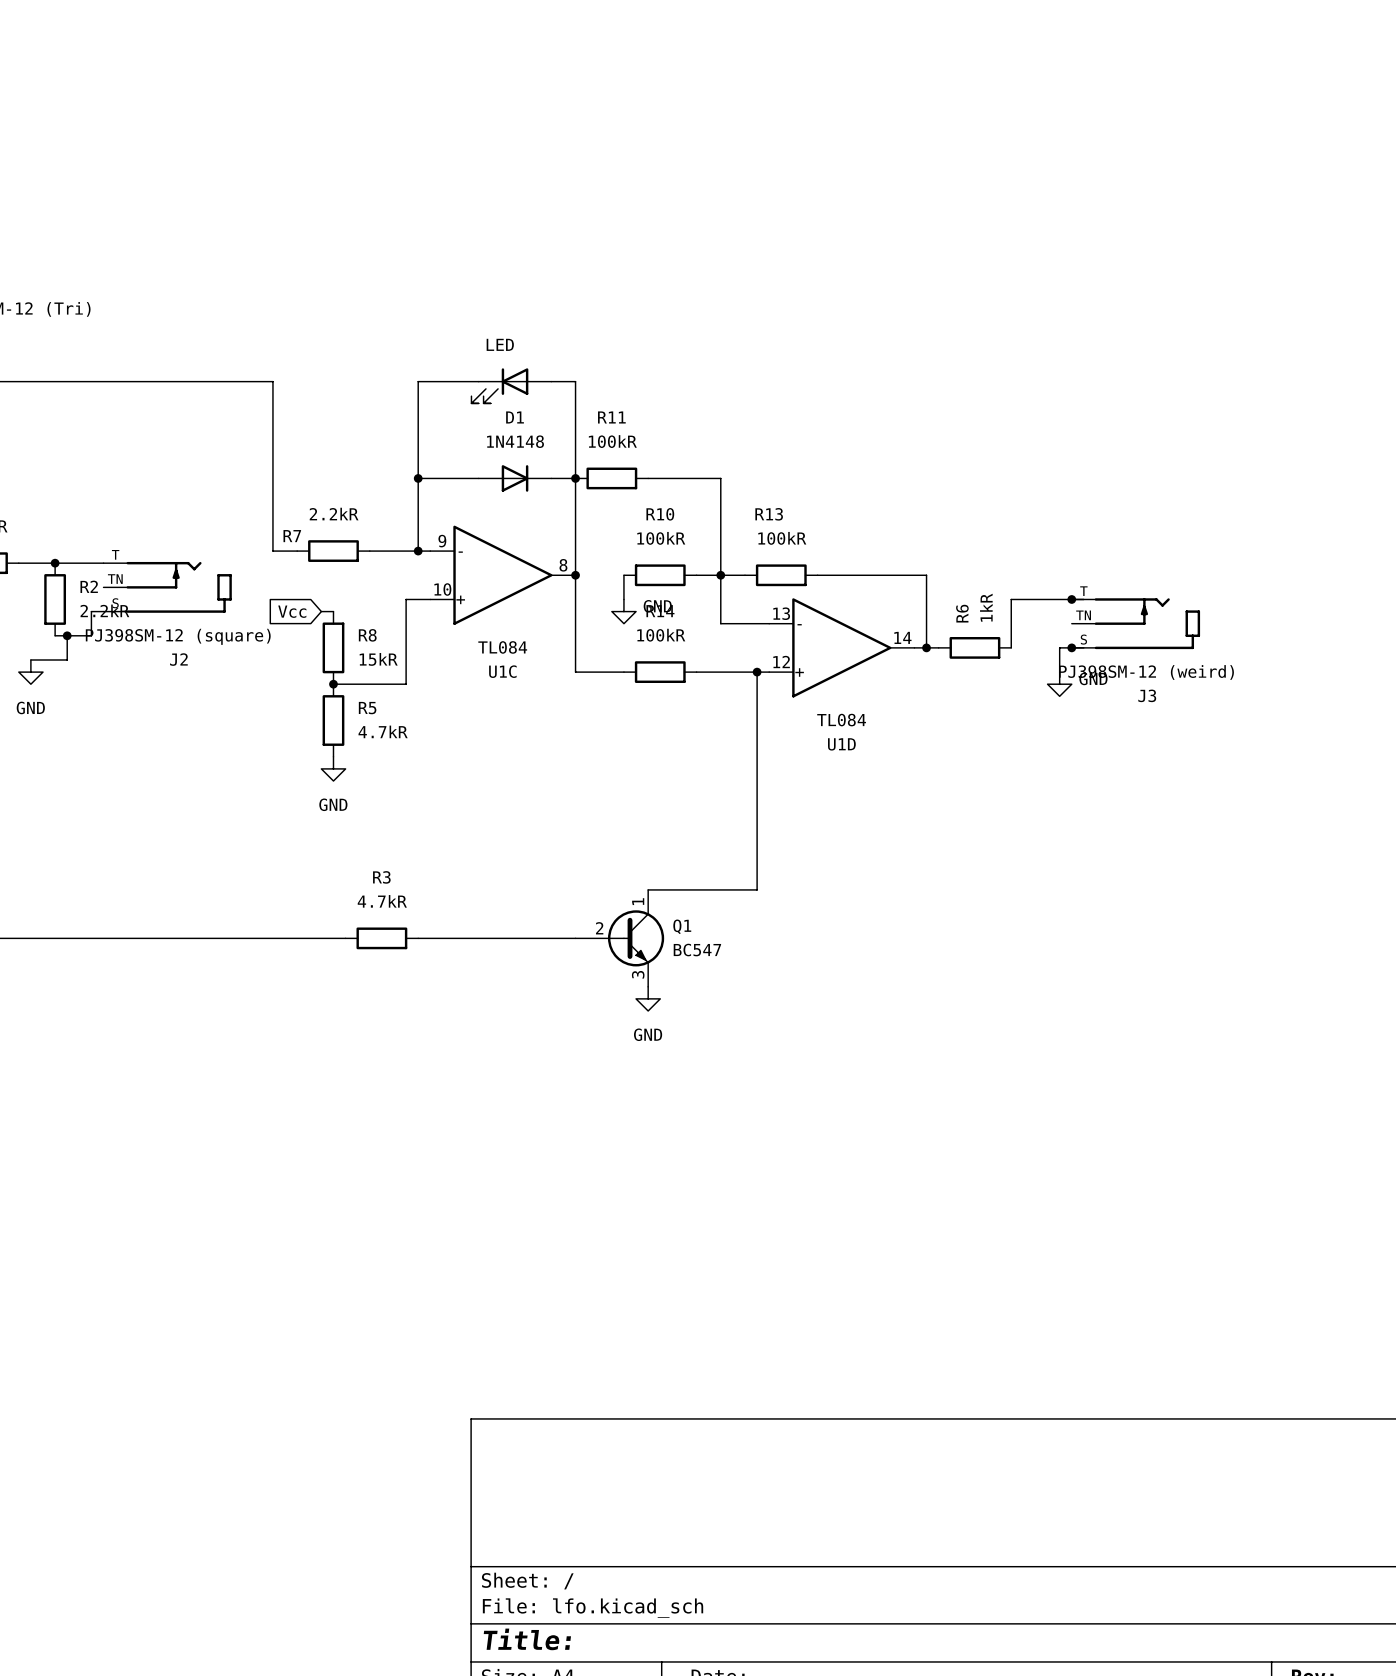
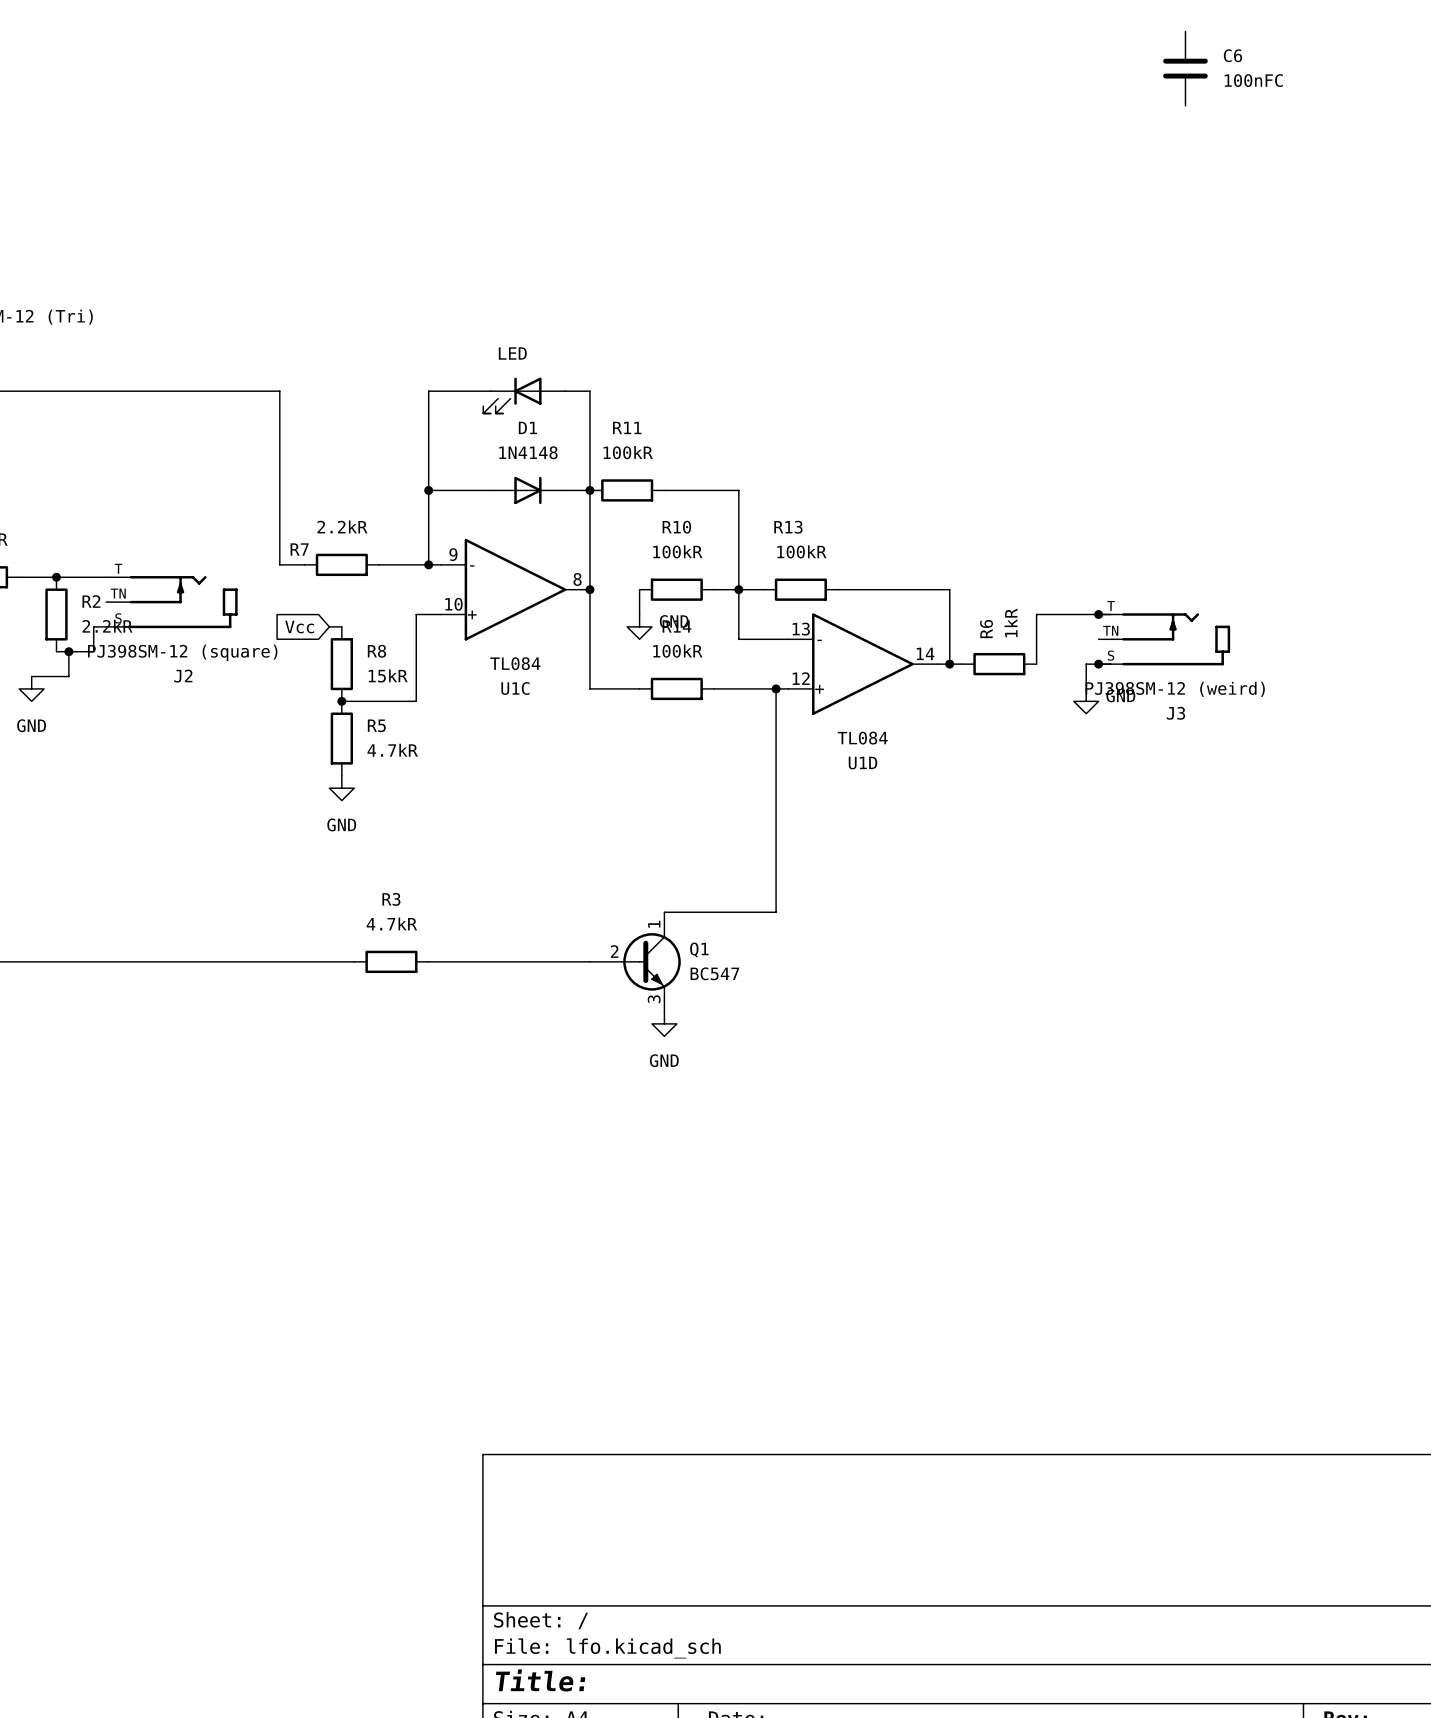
C6: none -> 100nFC (1185, 68)

